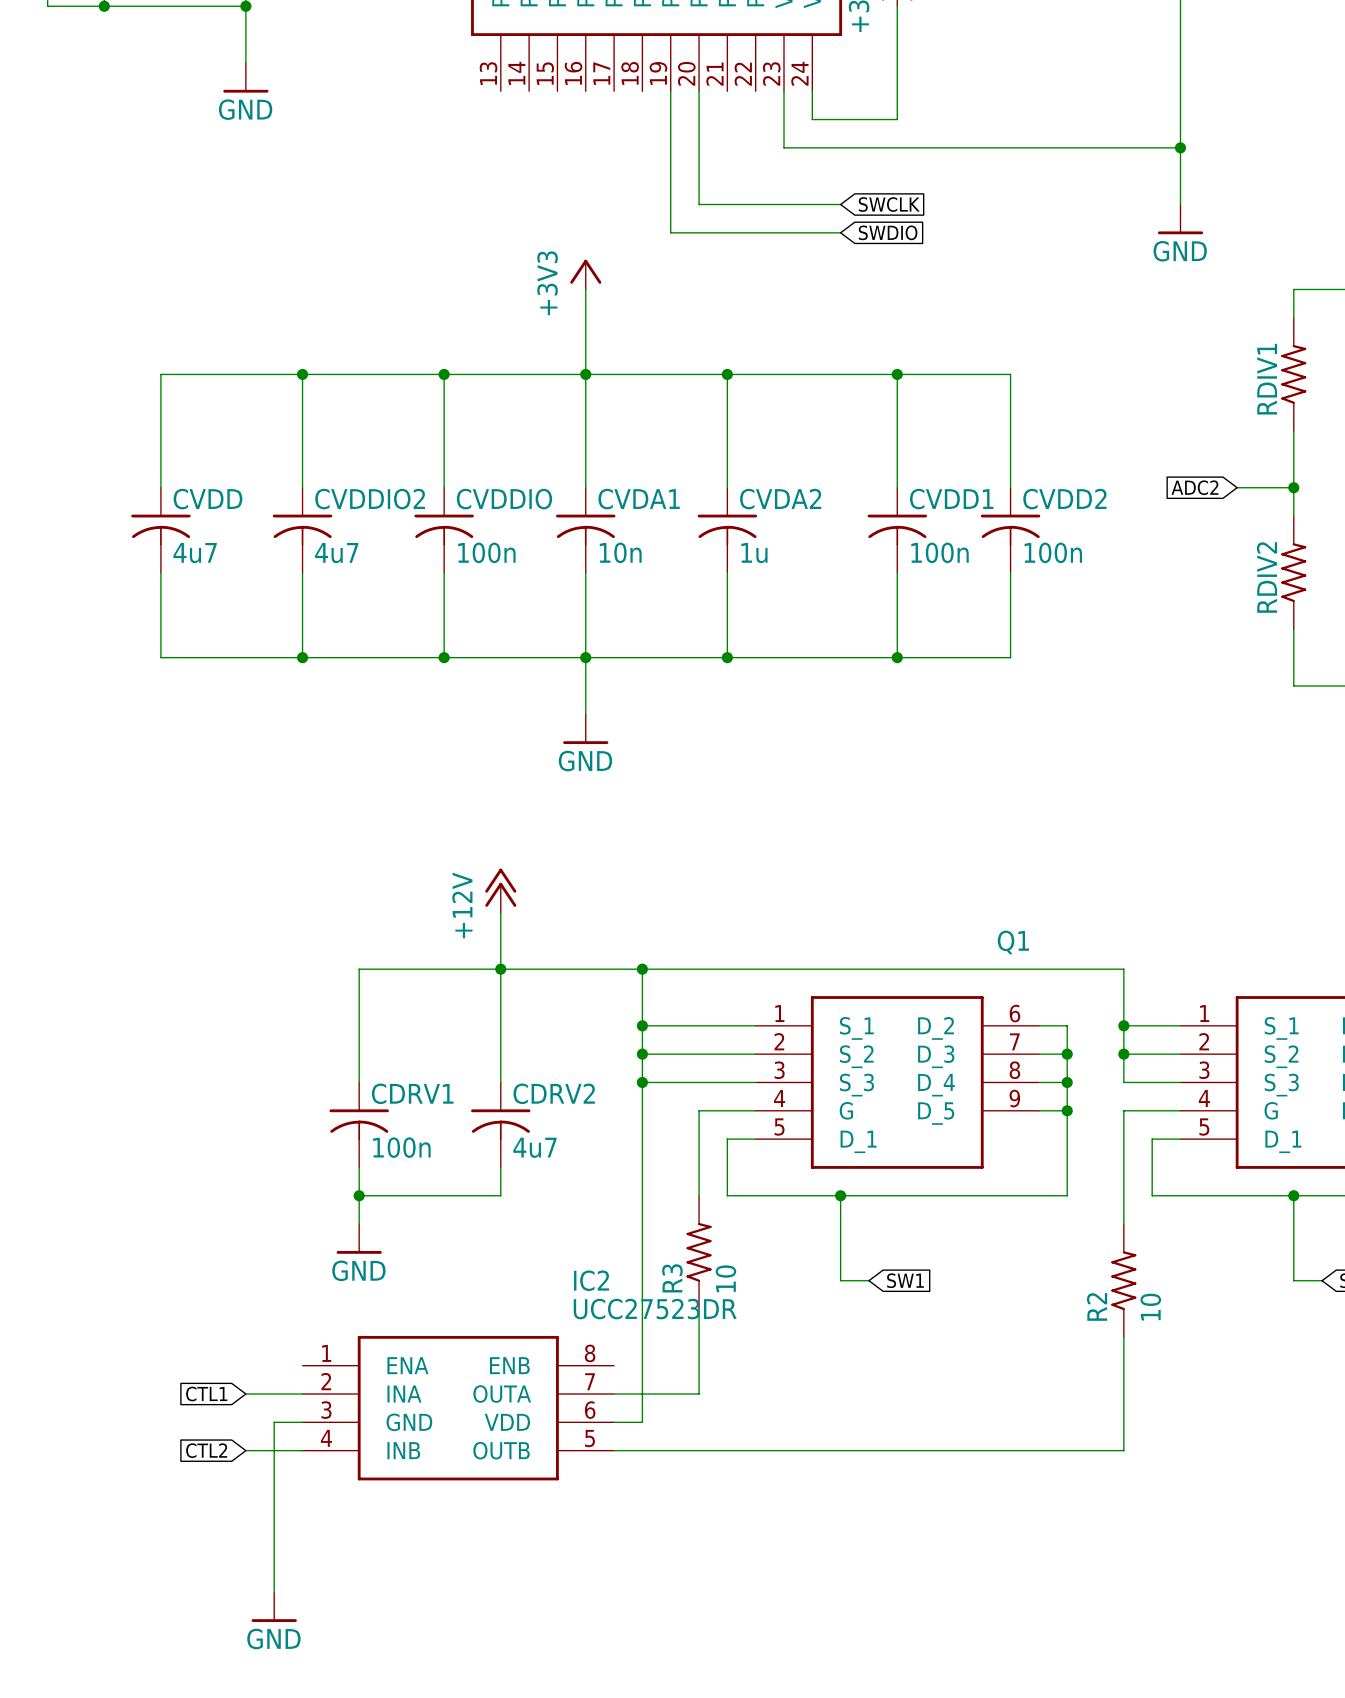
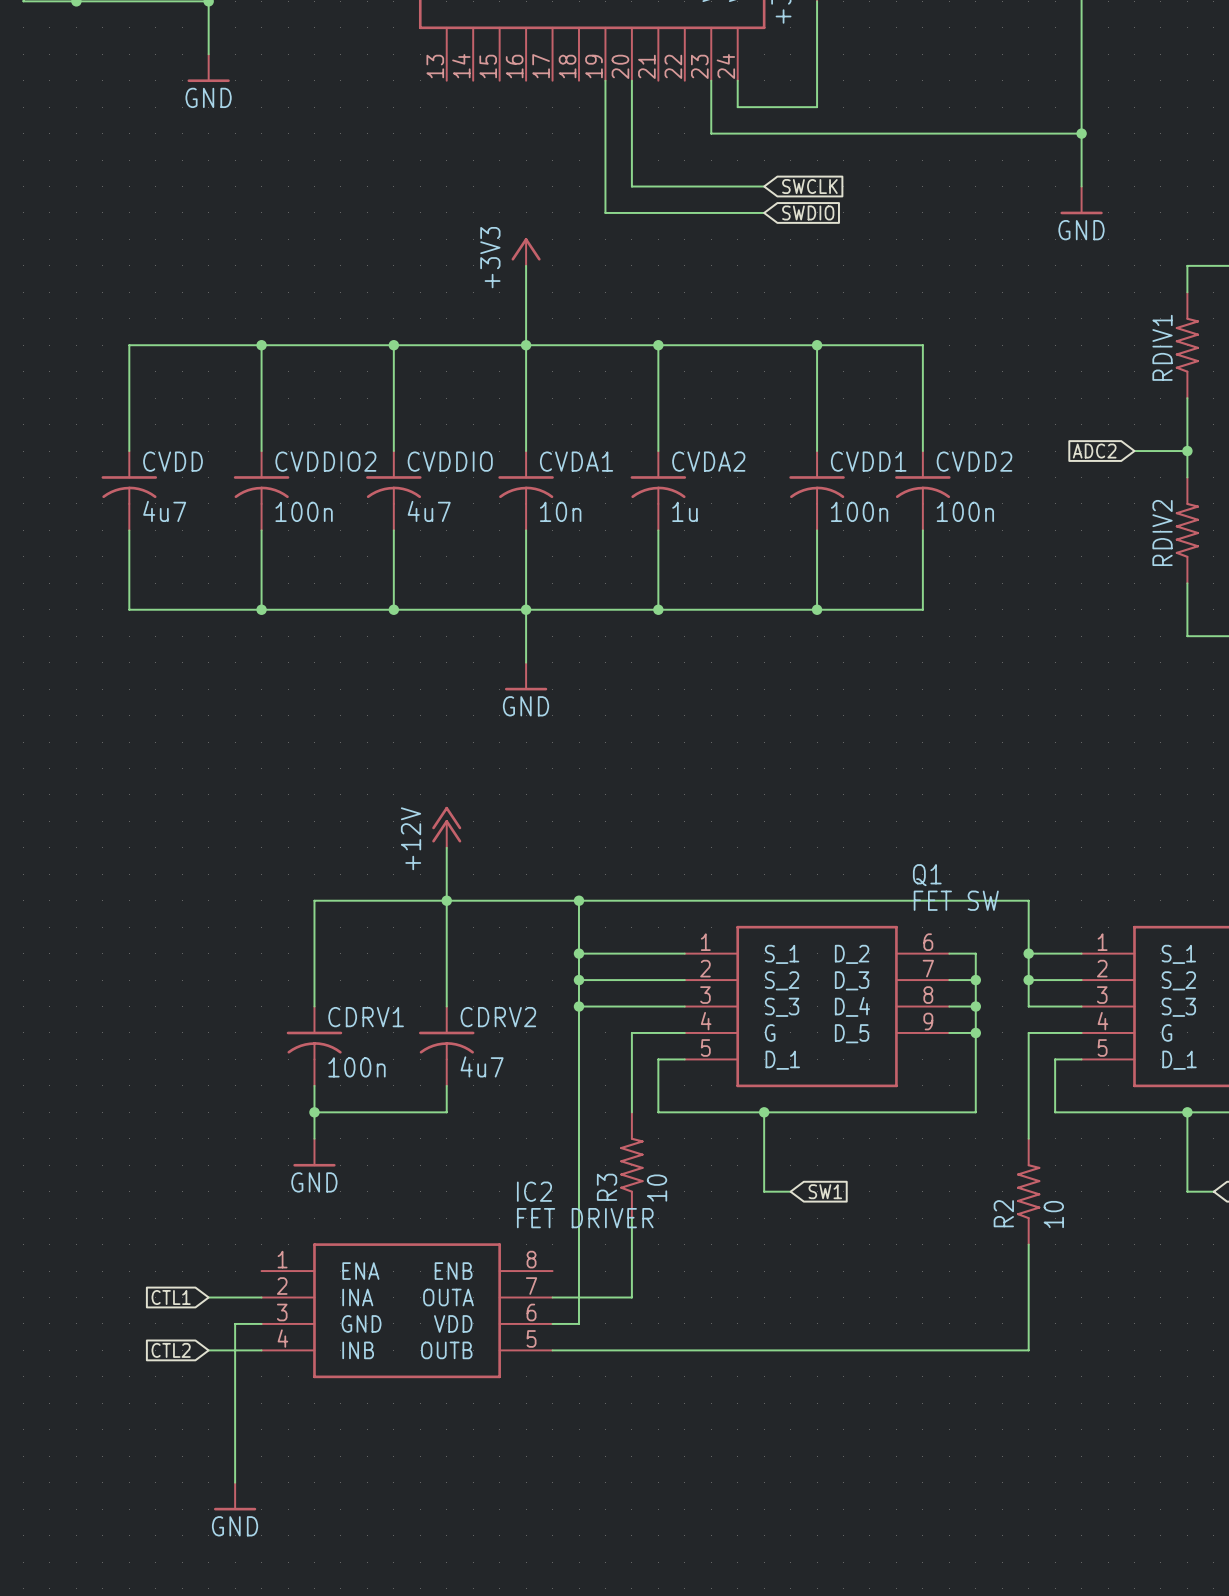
CVDDIO value: 100n (486, 552) -> 4u7 (429, 511)
CVDDIO2 value: 4u7 (336, 553) -> 100n (304, 511)
Q1 value: none -> FET SW (956, 900)
IC2 value: UCC27523DR (655, 1309) -> FET DRIVER (585, 1218)

